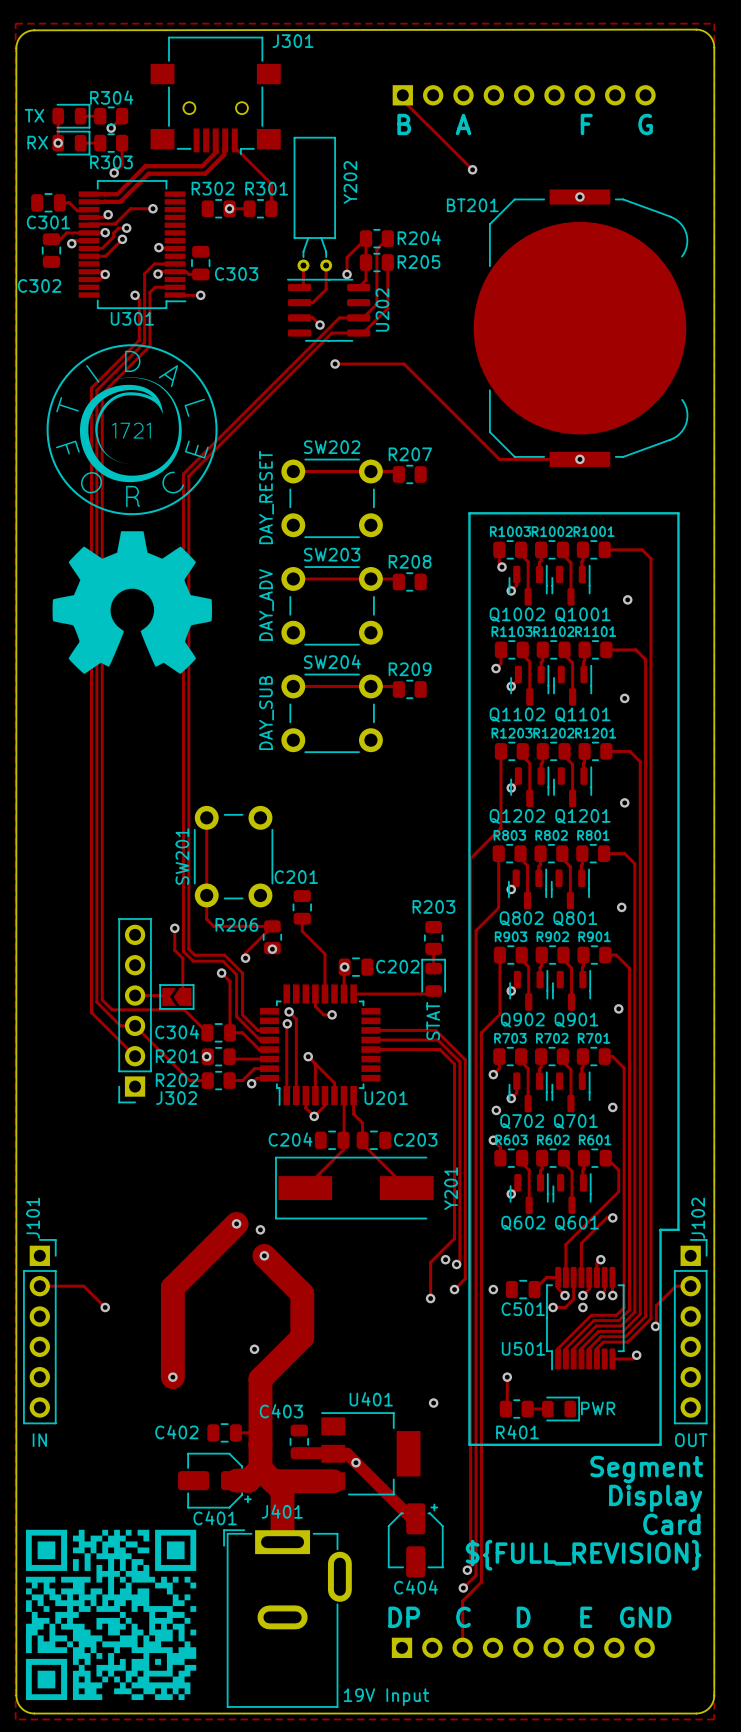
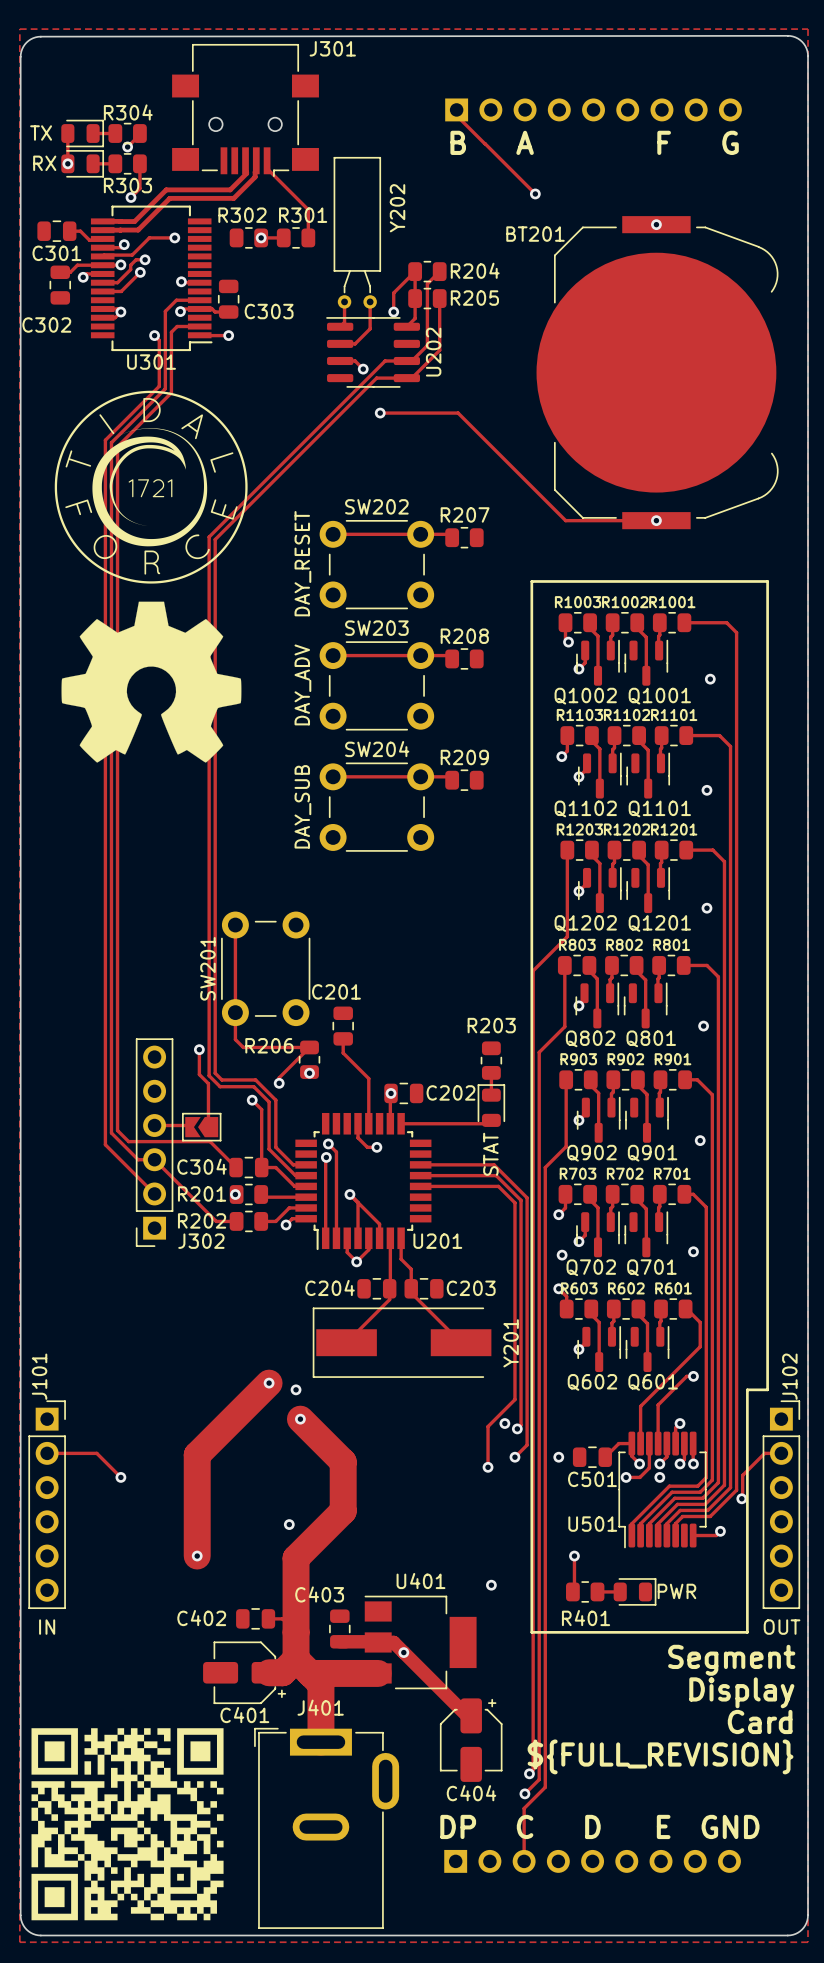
J401 value: 19V Input (386, 1697) -> none

